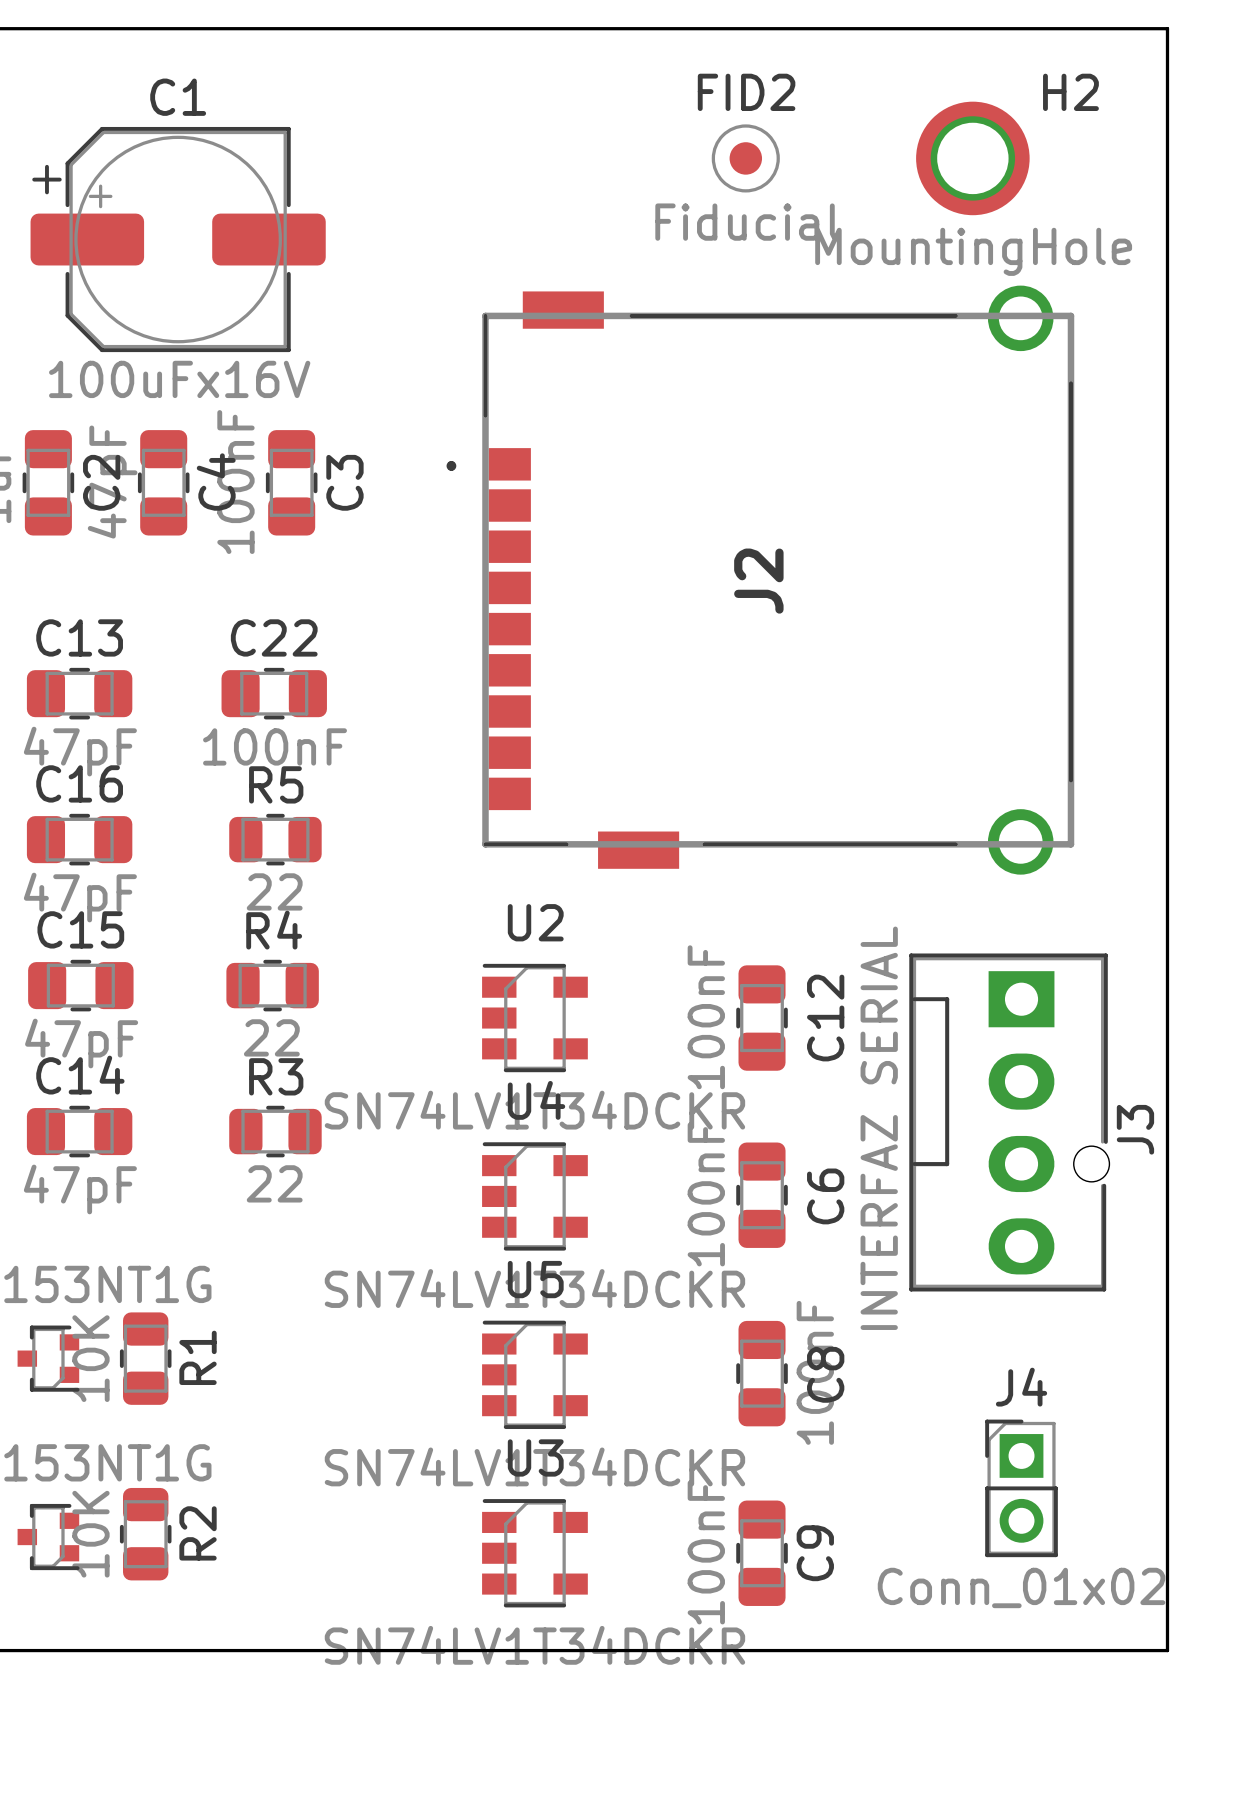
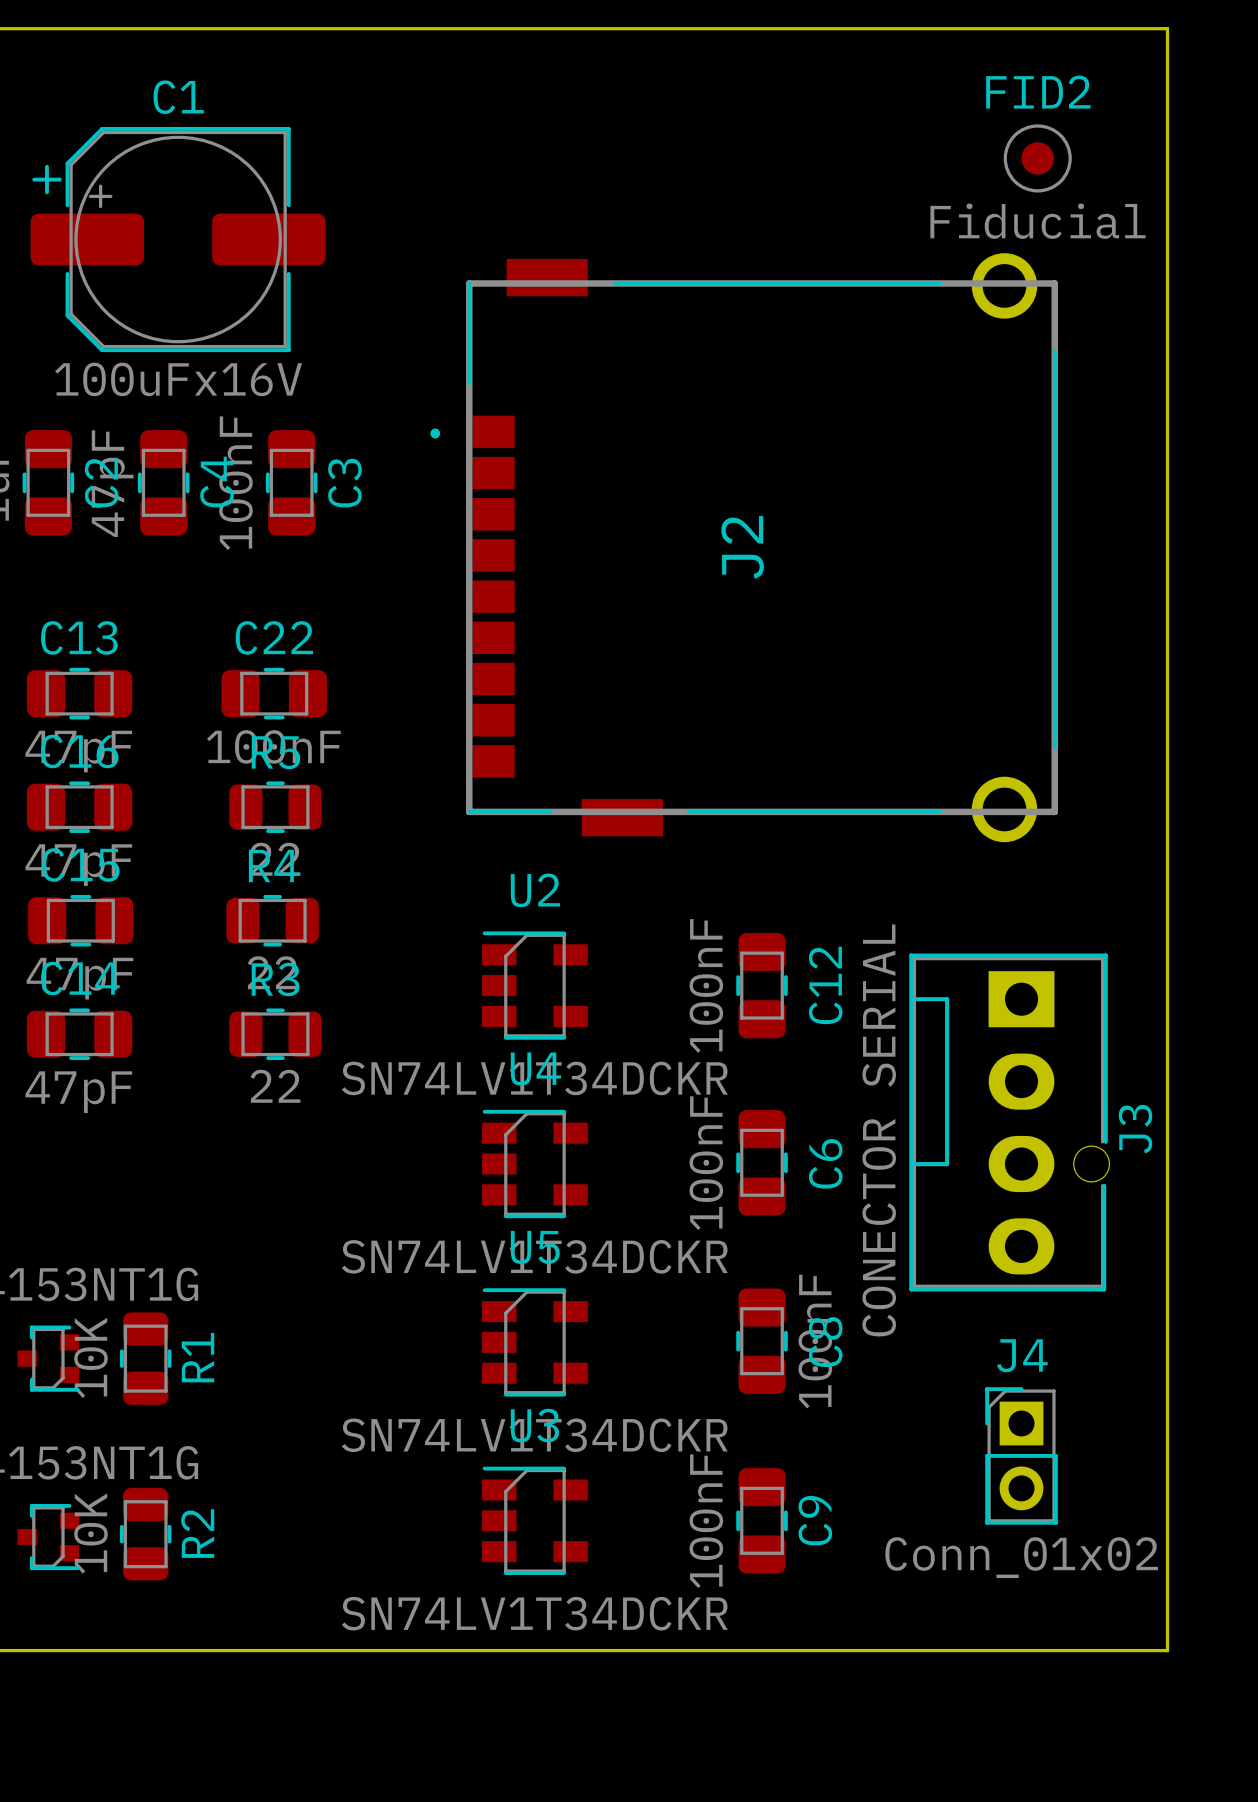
FID2 position: (745, 158) -> (1037, 158)
H2: MountingHole (972, 158) -> none
J2 position: (760, 580) -> (744, 547)
C16 position: (79, 839) -> (79, 807)
R5 position: (275, 839) -> (275, 807)
C15 position: (80, 985) -> (80, 920)
R4 position: (272, 985) -> (272, 920)
U2 position: (534, 1018) -> (534, 985)
C12 position: (762, 1018) -> (762, 985)
J3 value: INTERFAZ SERIAL (879, 1128) -> CONECTOR SERIAL (879, 1130)
C14 position: (79, 1131) -> (79, 1034)
R3 position: (275, 1131) -> (275, 1034)
C6 position: (762, 1195) -> (762, 1162)
U4 position: (534, 1196) -> (534, 1164)
C8 position: (762, 1373) -> (762, 1341)
U5 position: (534, 1374) -> (534, 1342)
J4 position: (1021, 1488) -> (1021, 1455)
U3 position: (534, 1553) -> (534, 1520)
C9 position: (762, 1553) -> (762, 1520)

